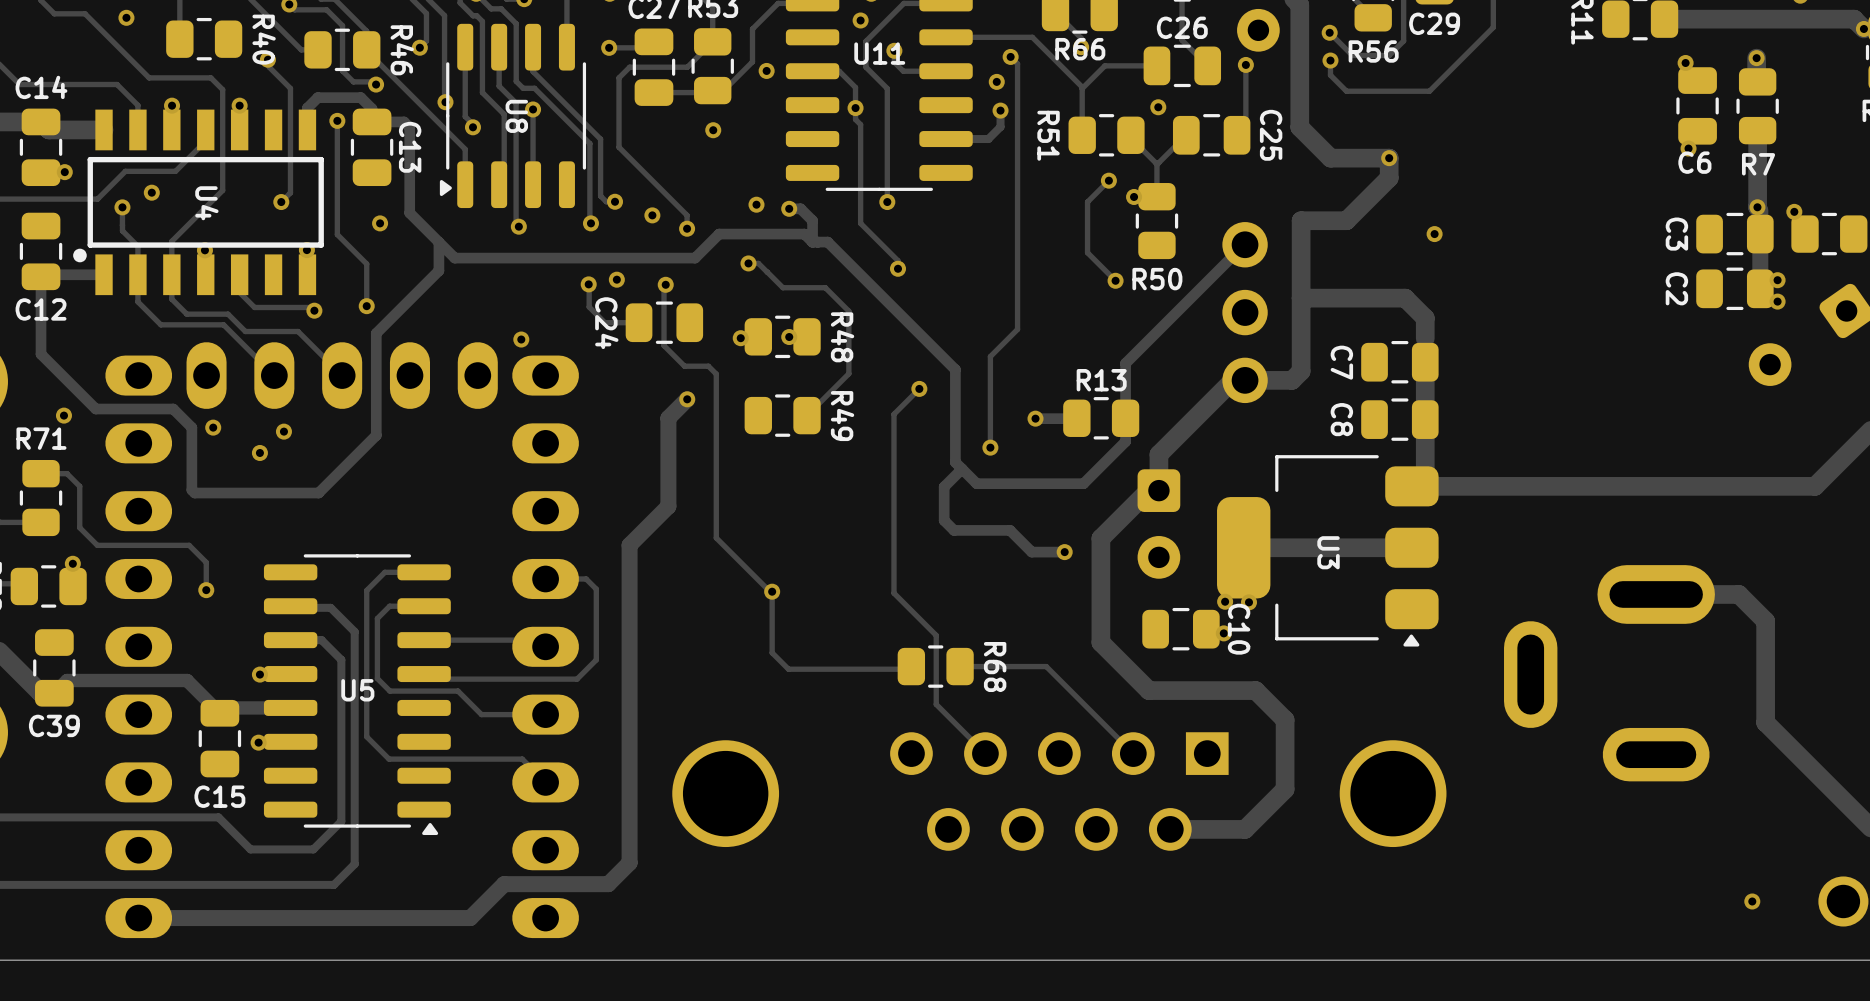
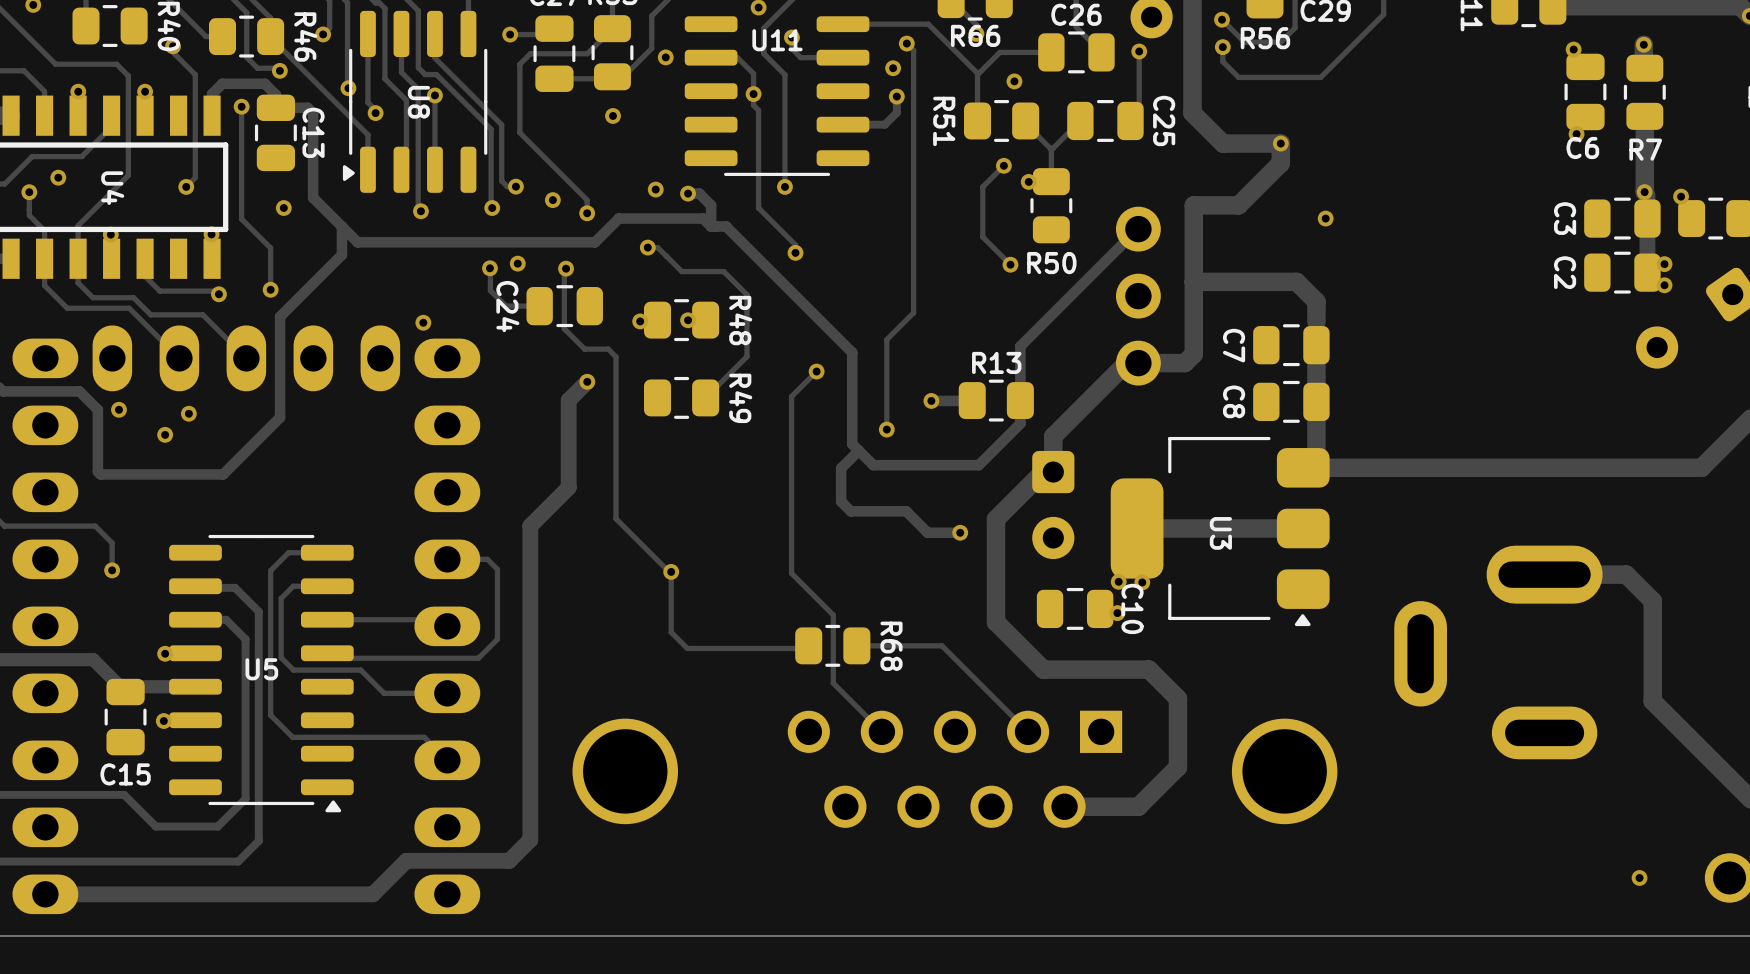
via position: (1158, 107) -> (1014, 81)

